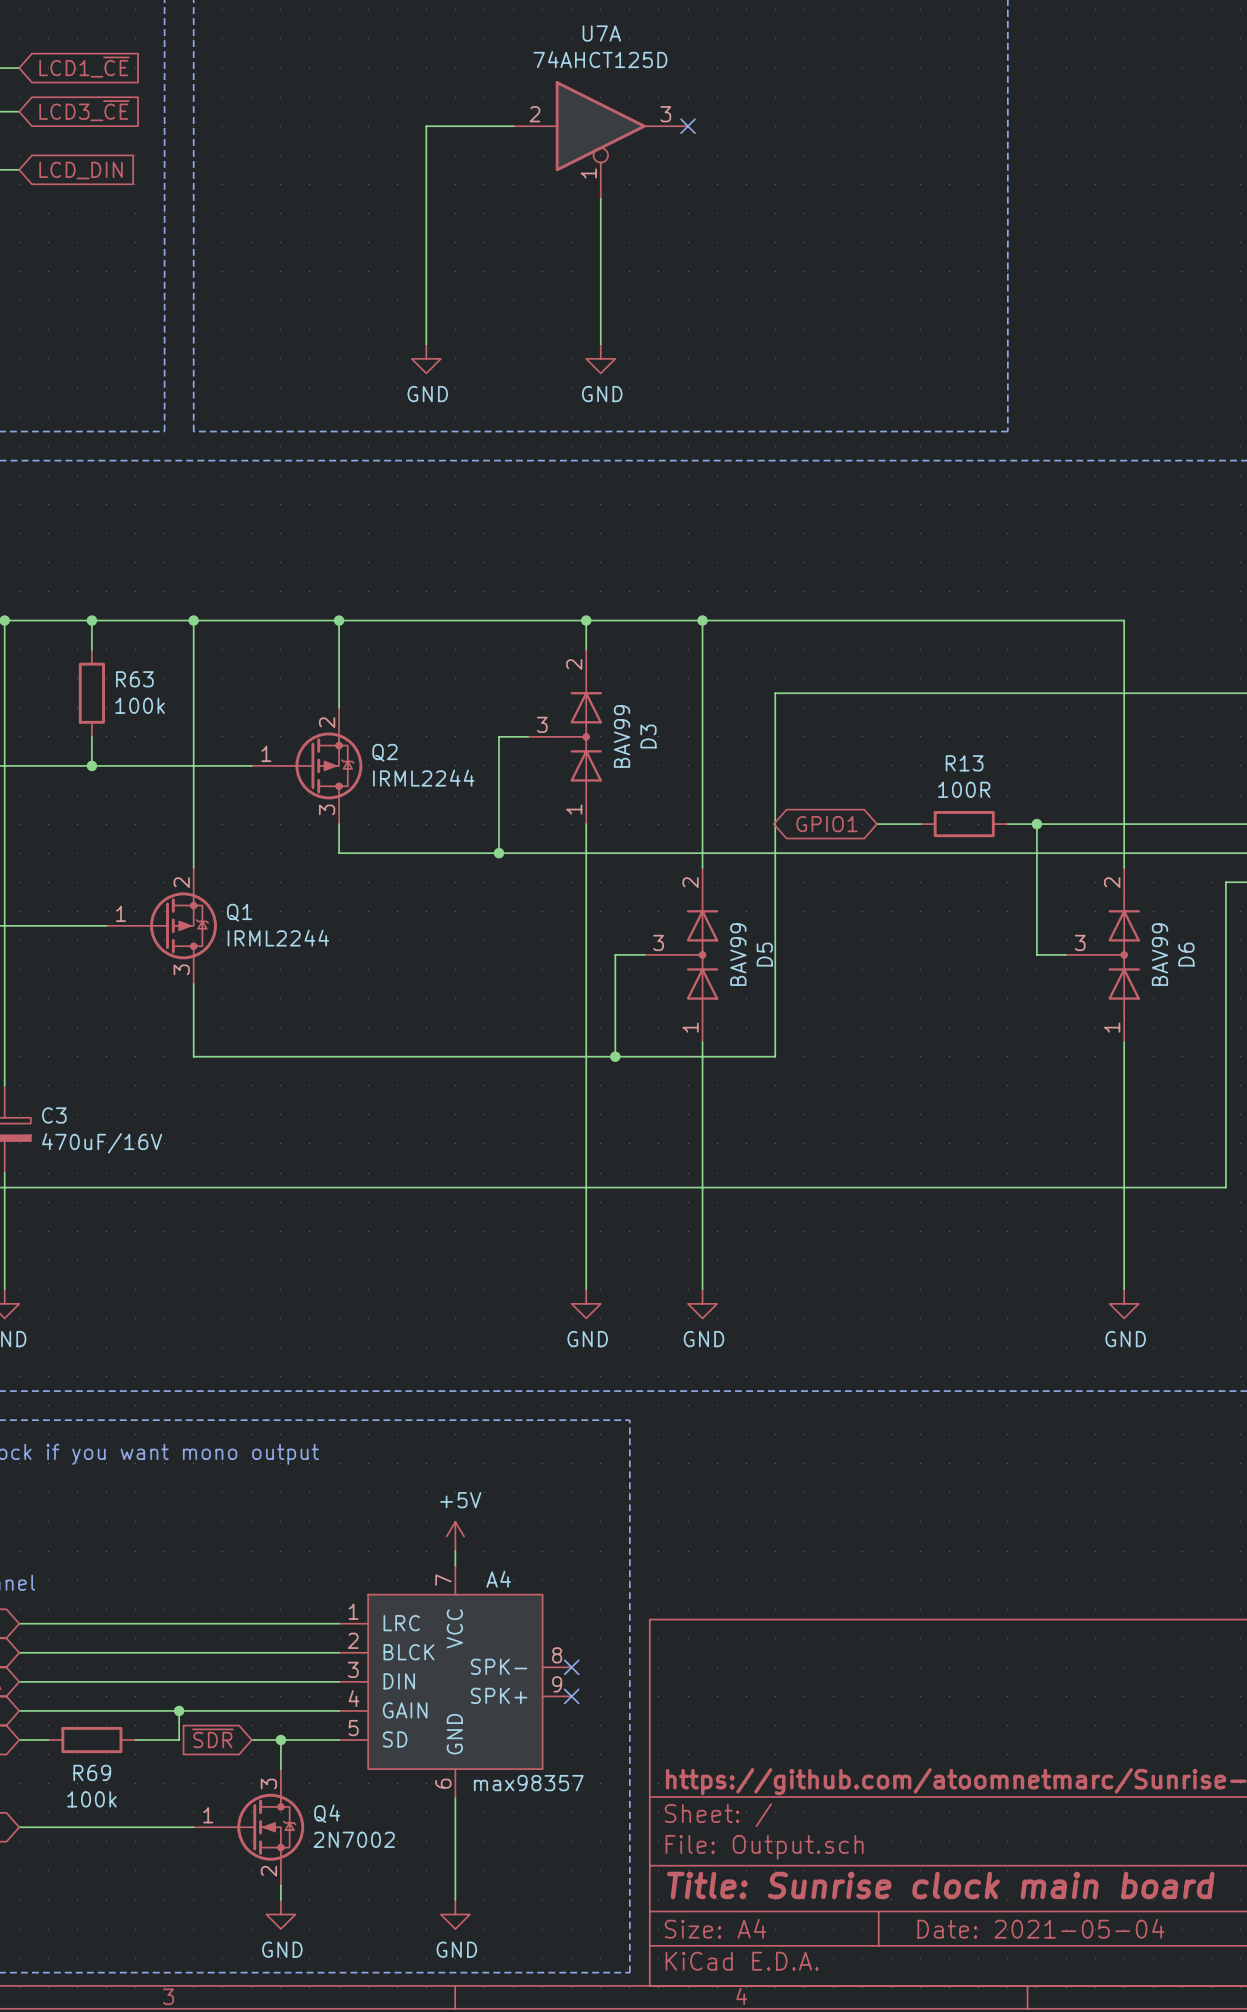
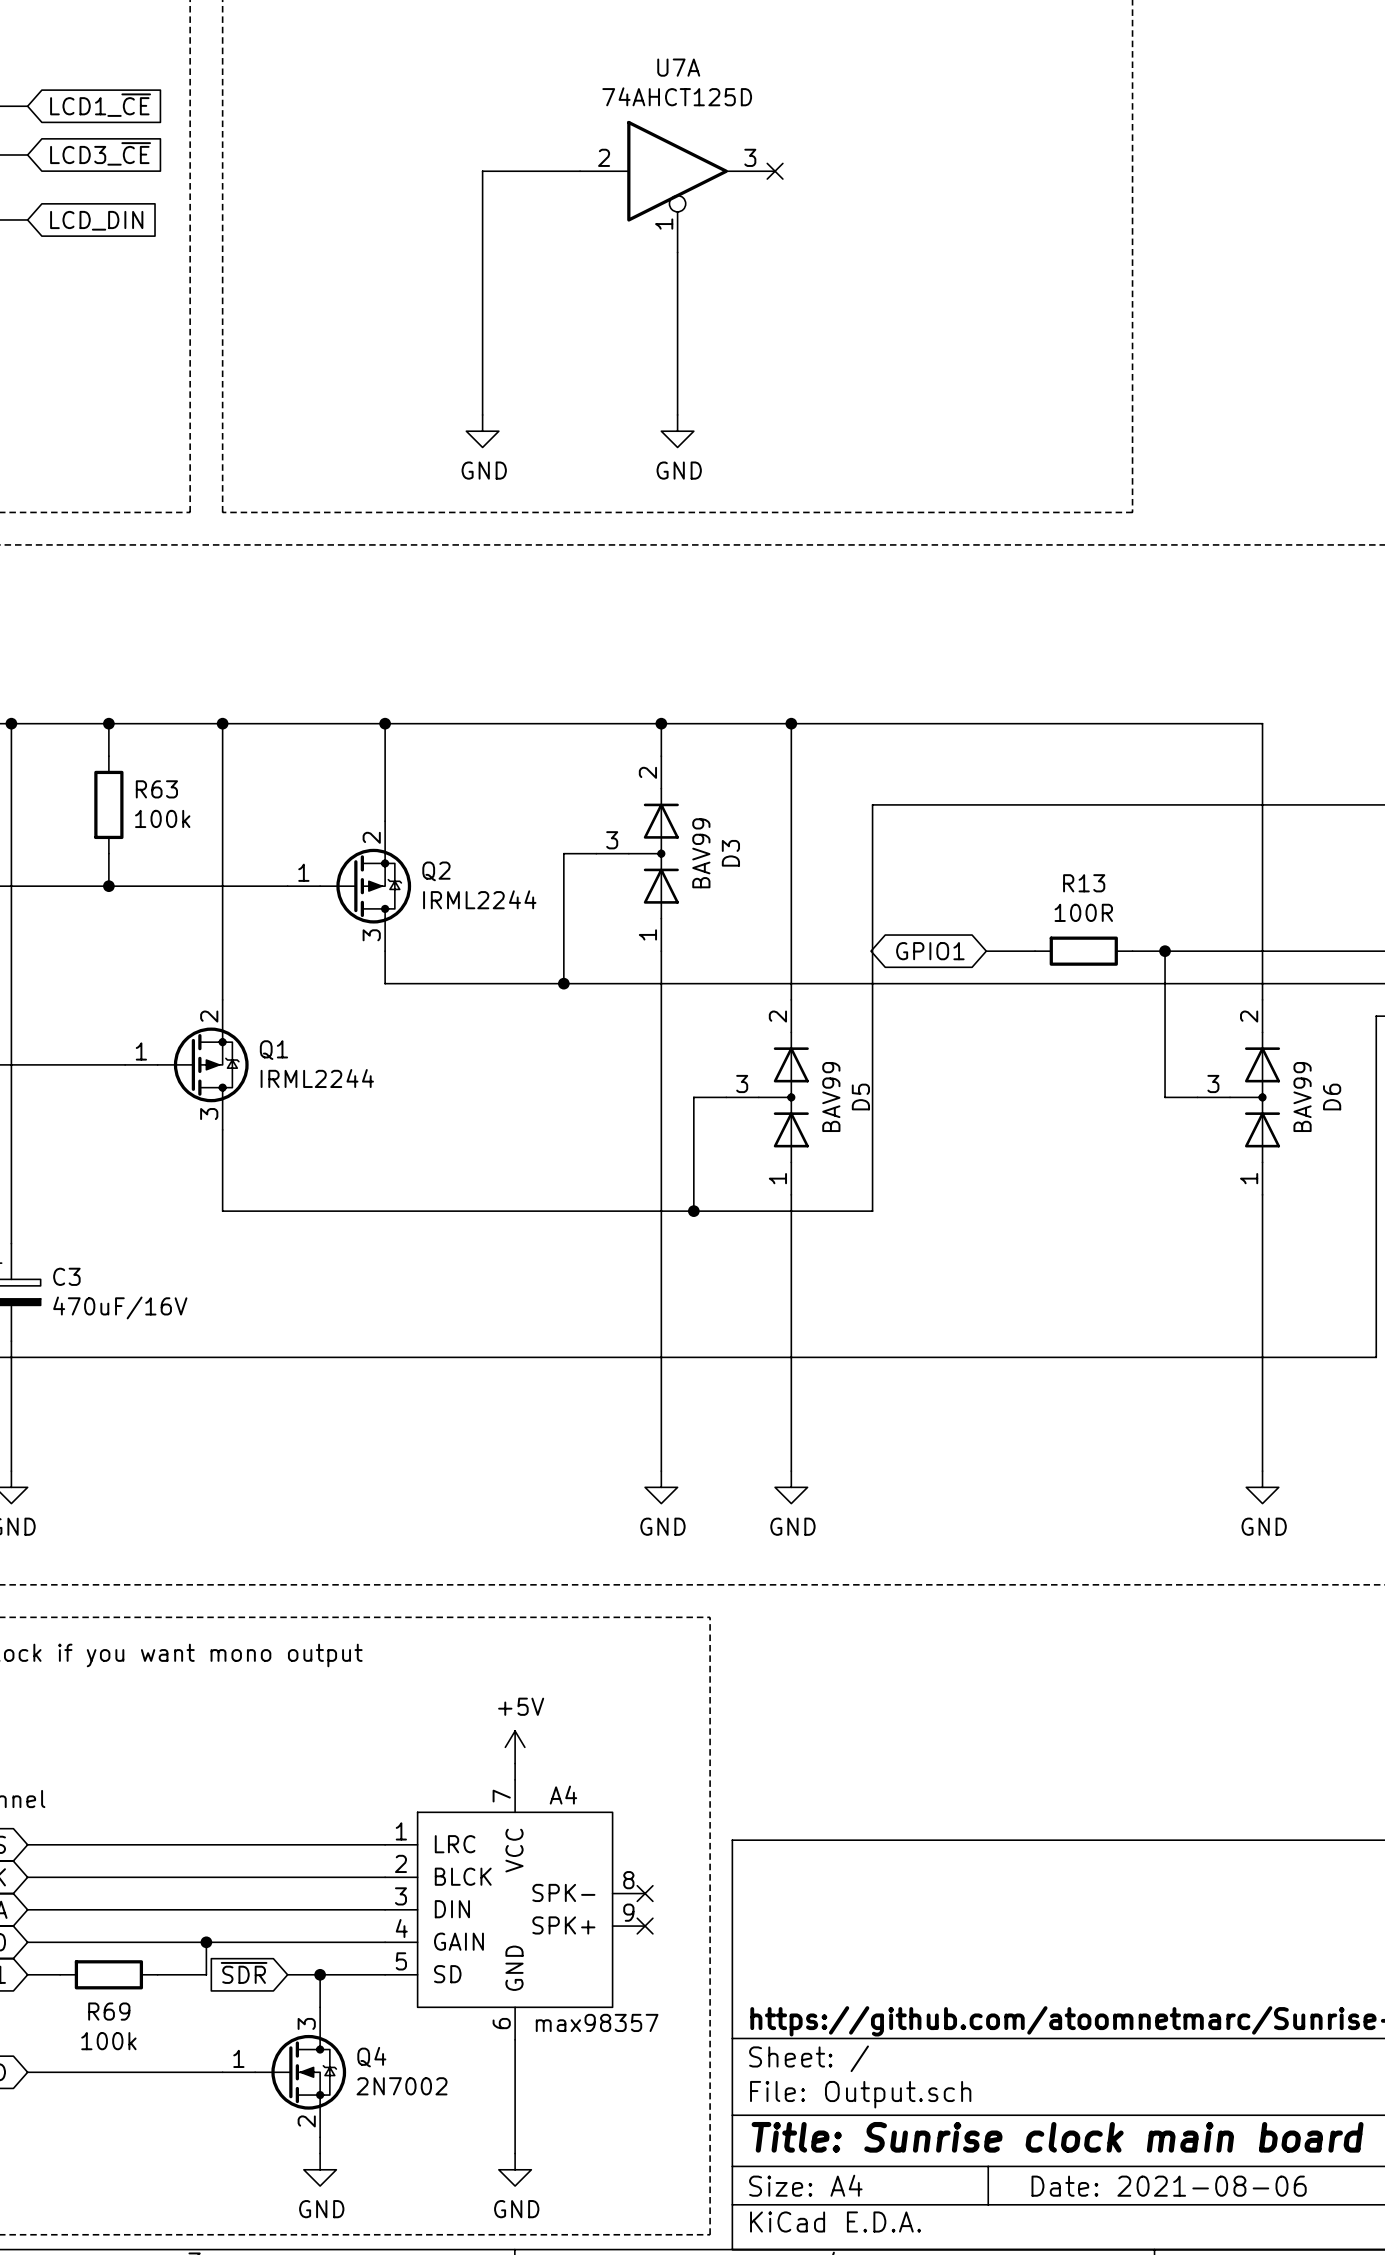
title block: Date: 2021-05-04 (1040, 1928) -> Date: 2021-08-06 (1169, 2186)

